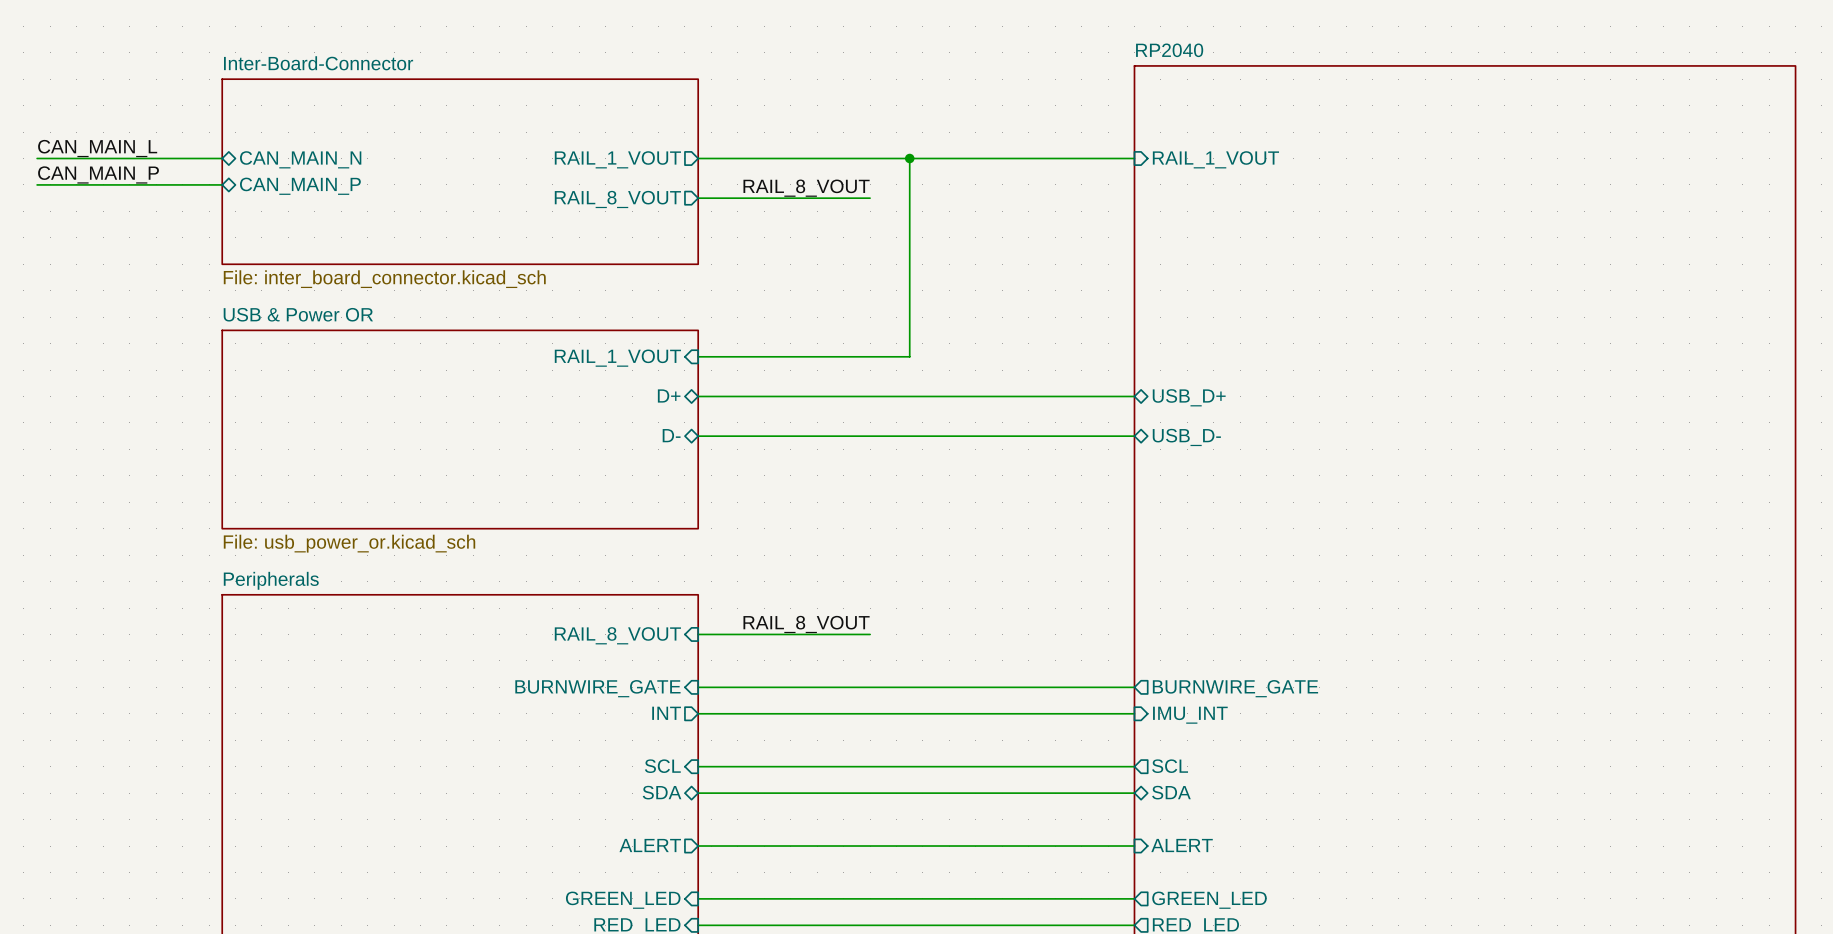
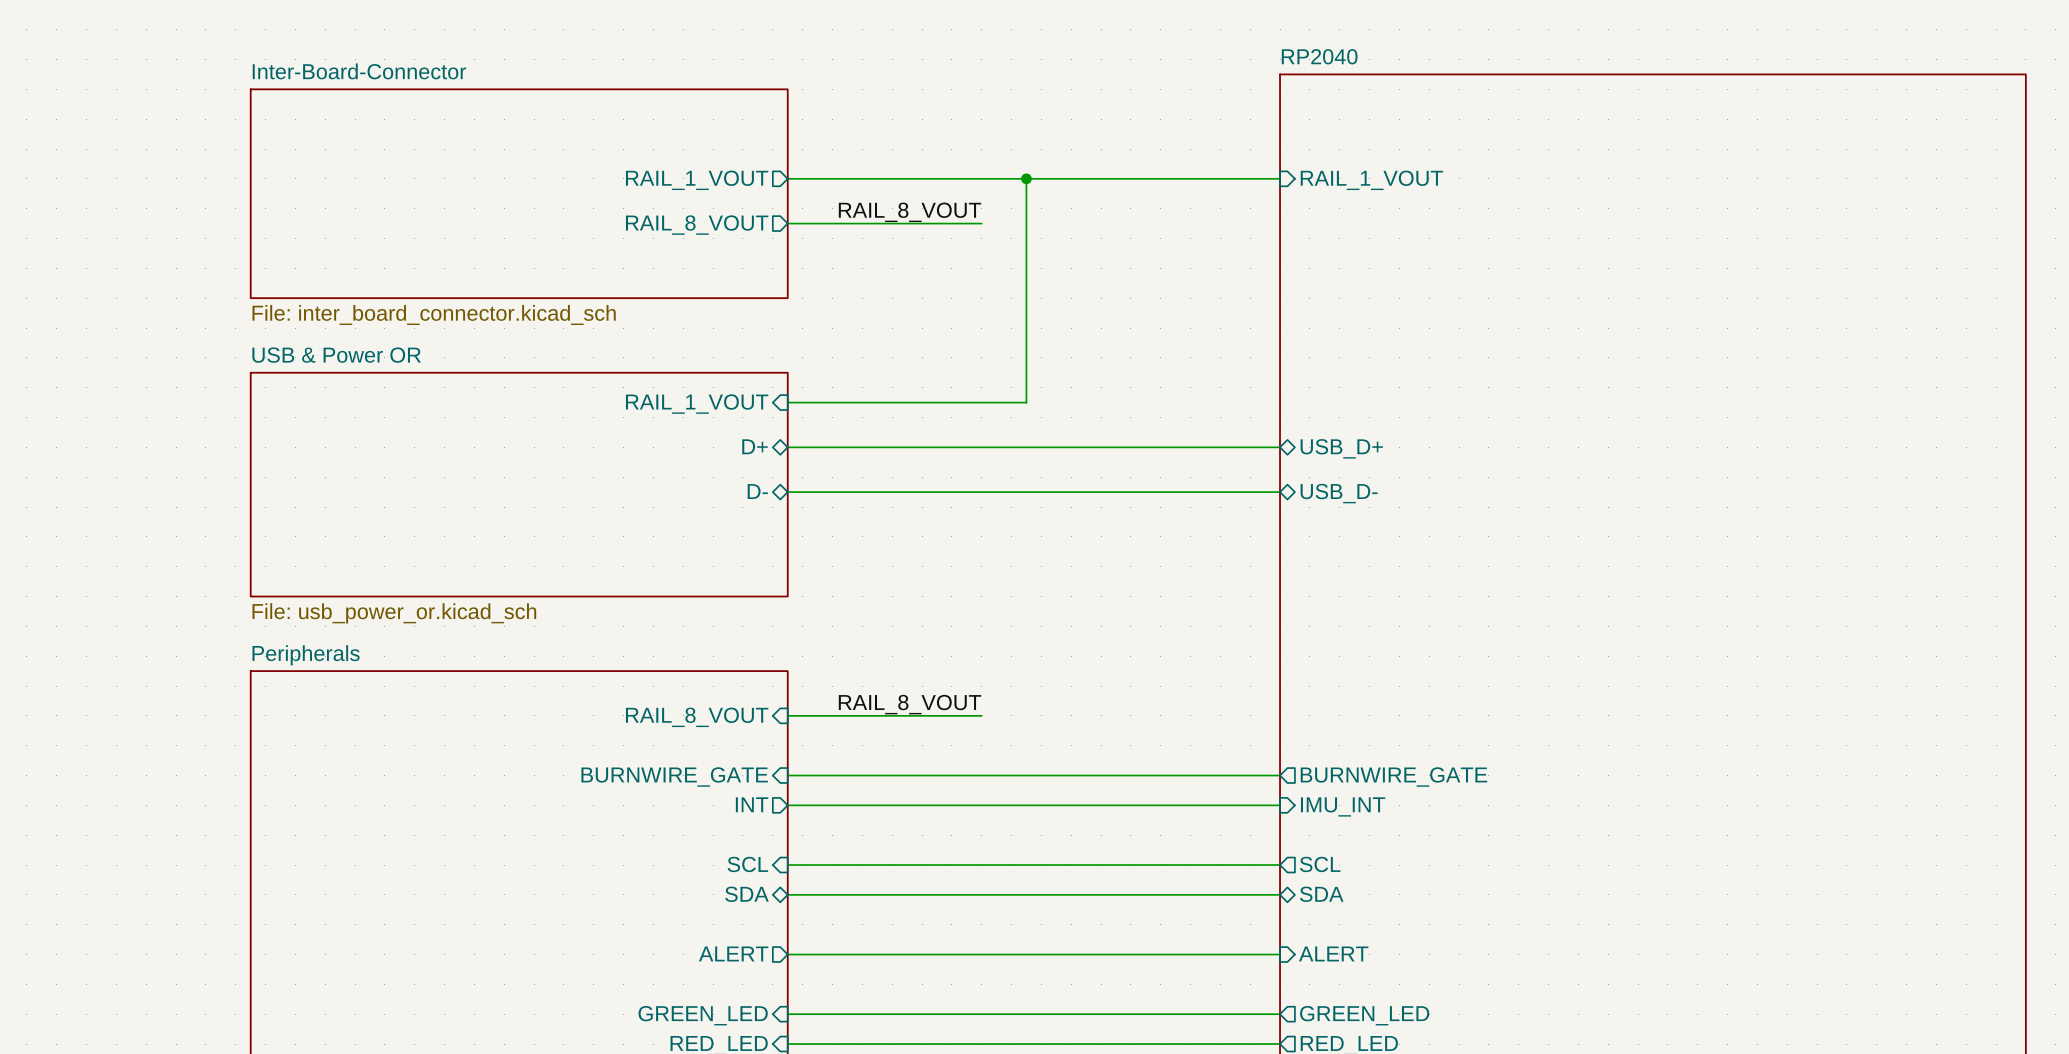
label: CAN_MAIN_L (97, 148) -> none
wire: (37, 158) (222, 158) -> none
sheet pin: CAN_MAIN_N (300, 159) -> none
label: CAN_MAIN_P (98, 174) -> none
wire: (37, 184) (222, 184) -> none
sheet pin: CAN_MAIN_P (300, 186) -> none

